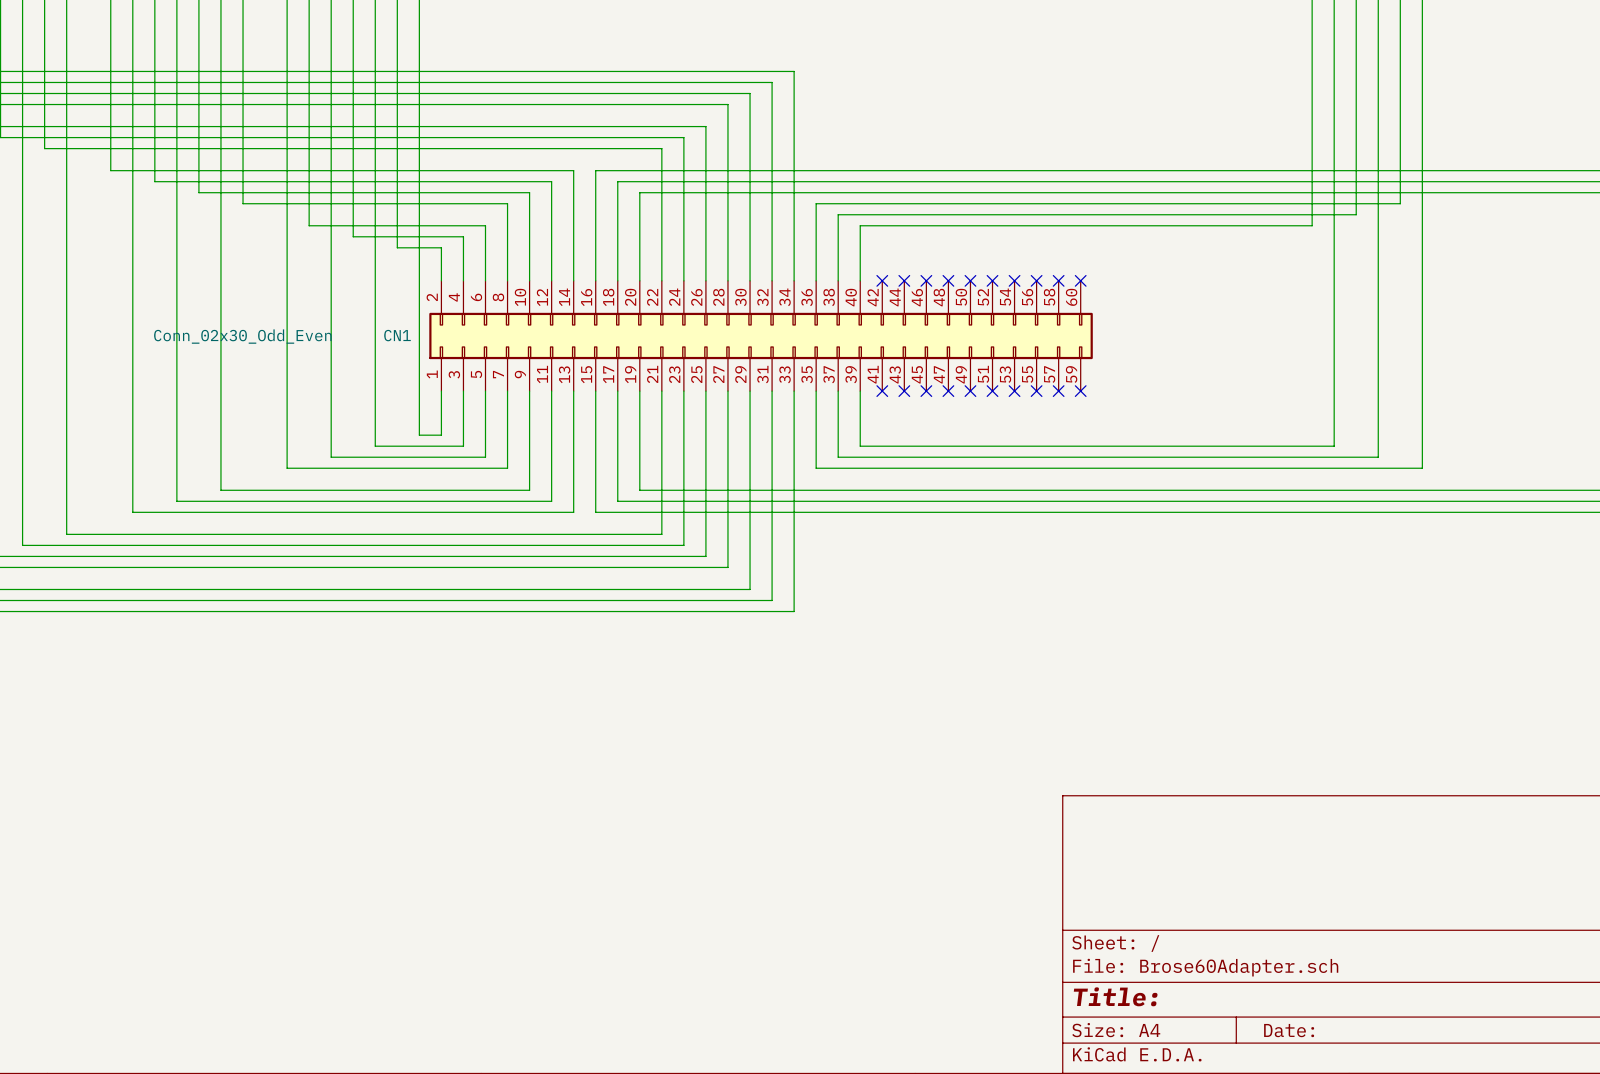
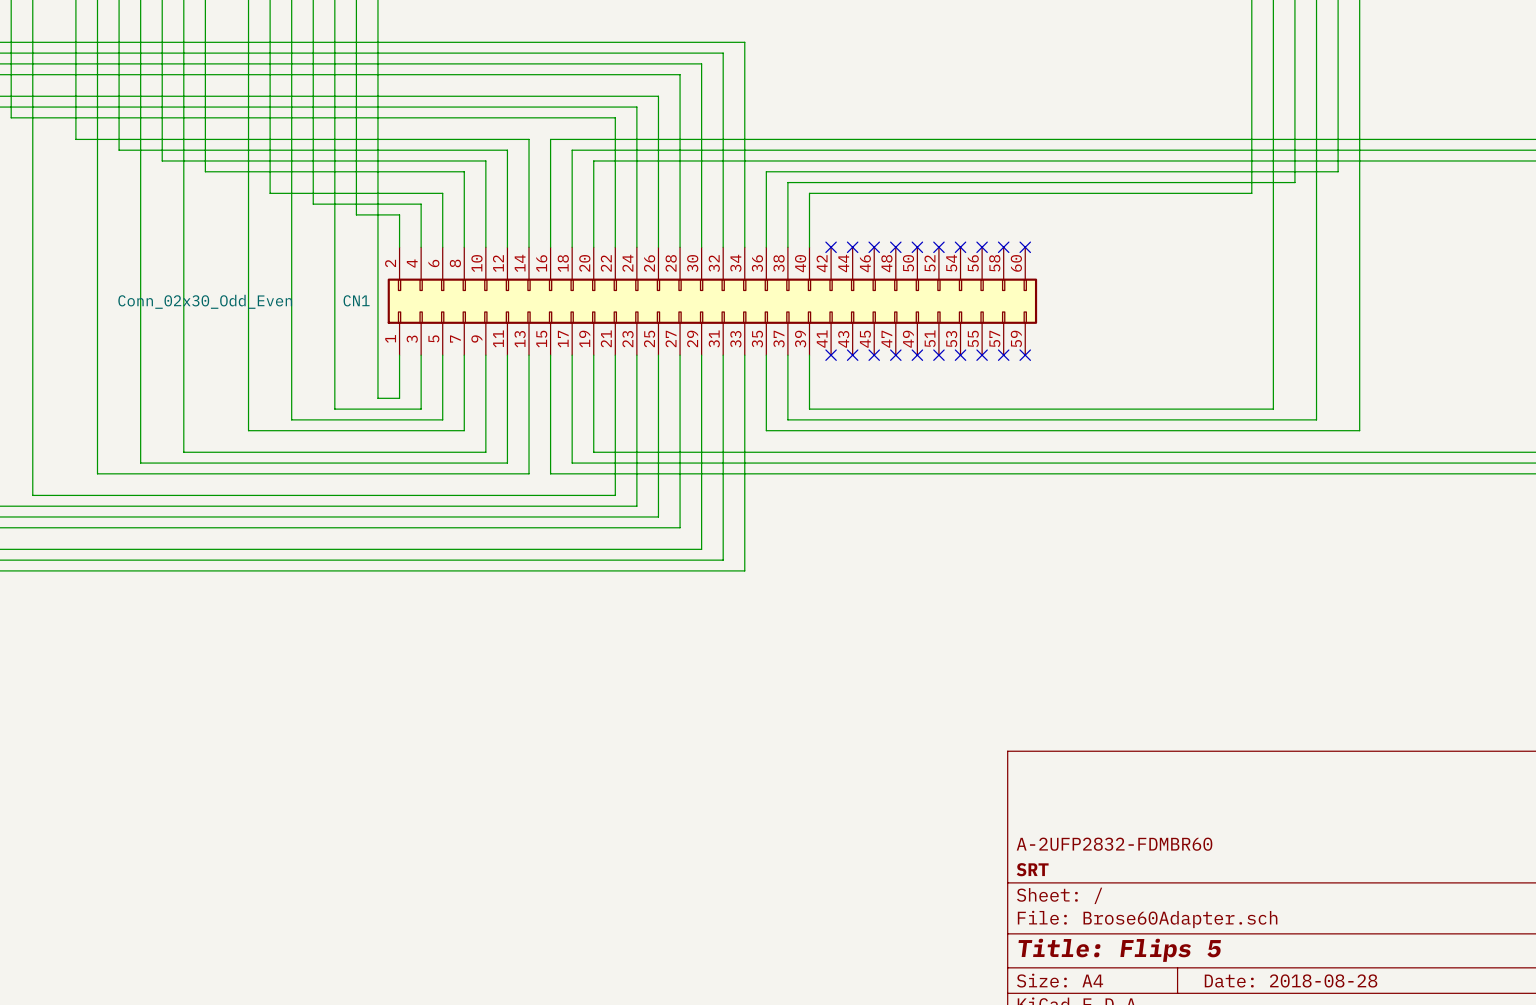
title block: none -> A-2UFP2832-FDMBR60 (1114, 844)
title block: none -> SRT (1032, 869)
title block: Title: (1115, 996) -> Title: Flips 5 (1119, 950)
title block: Date: (1289, 1030) -> Date: 2018-08-28 (1291, 980)

